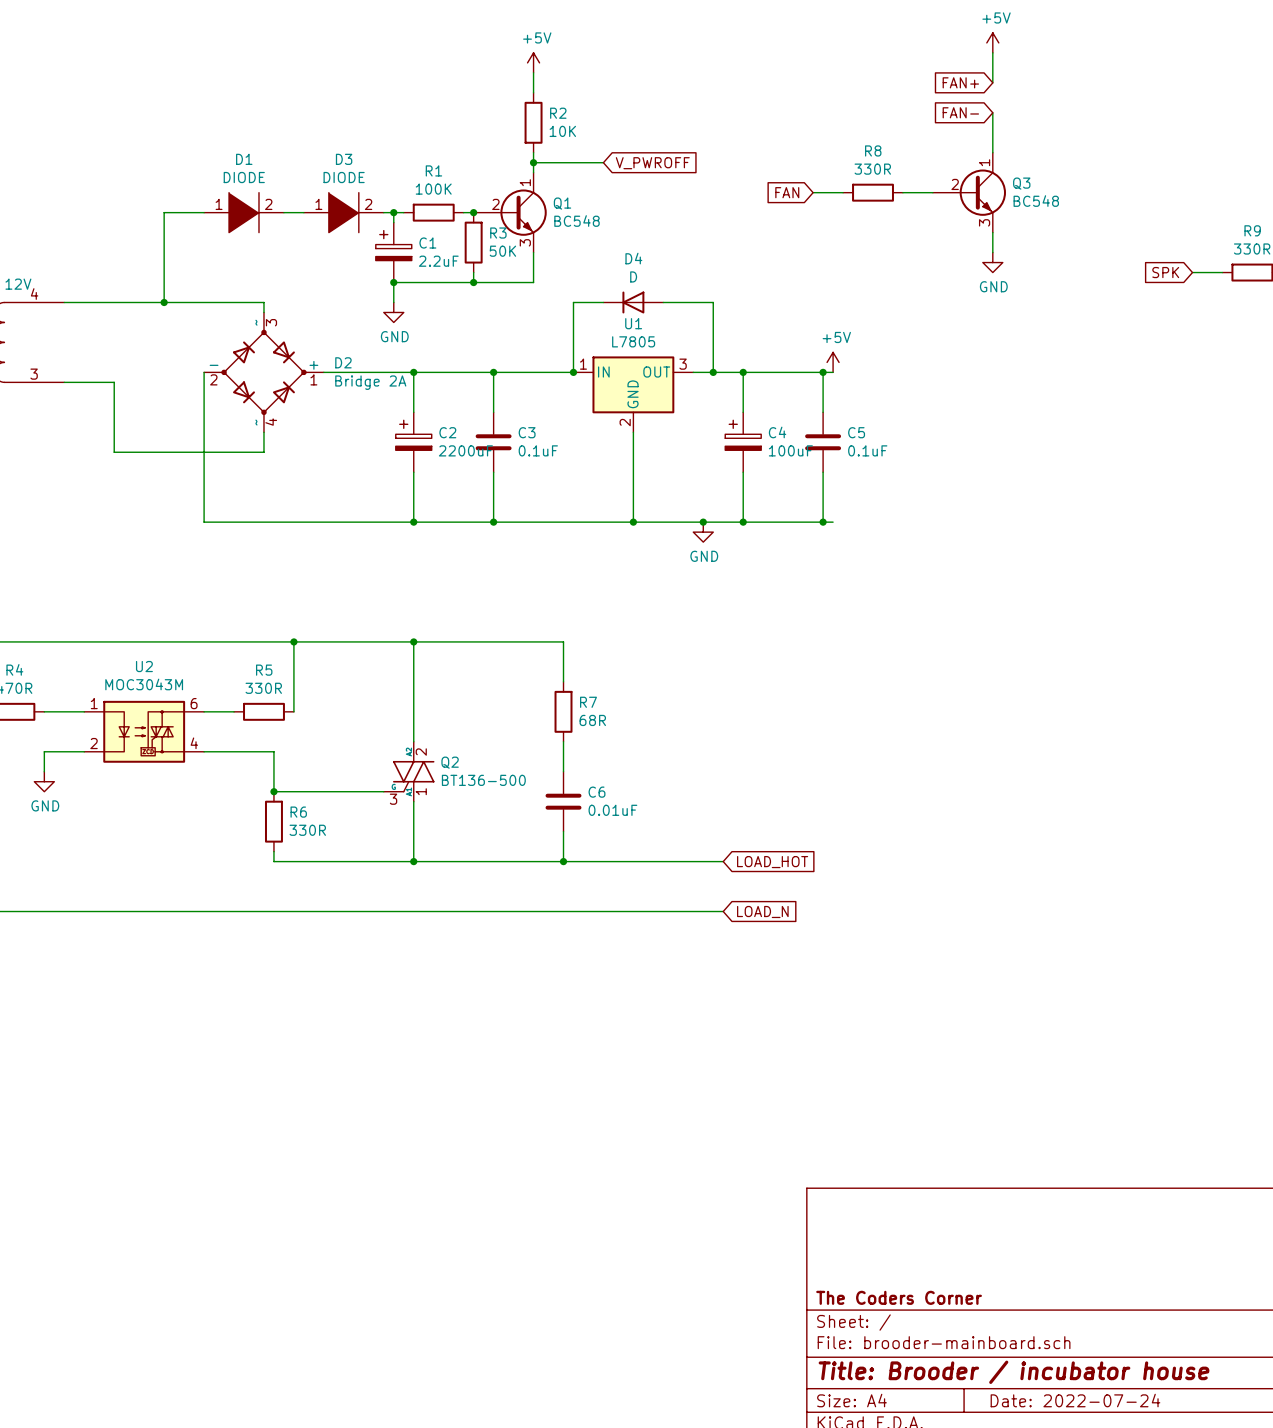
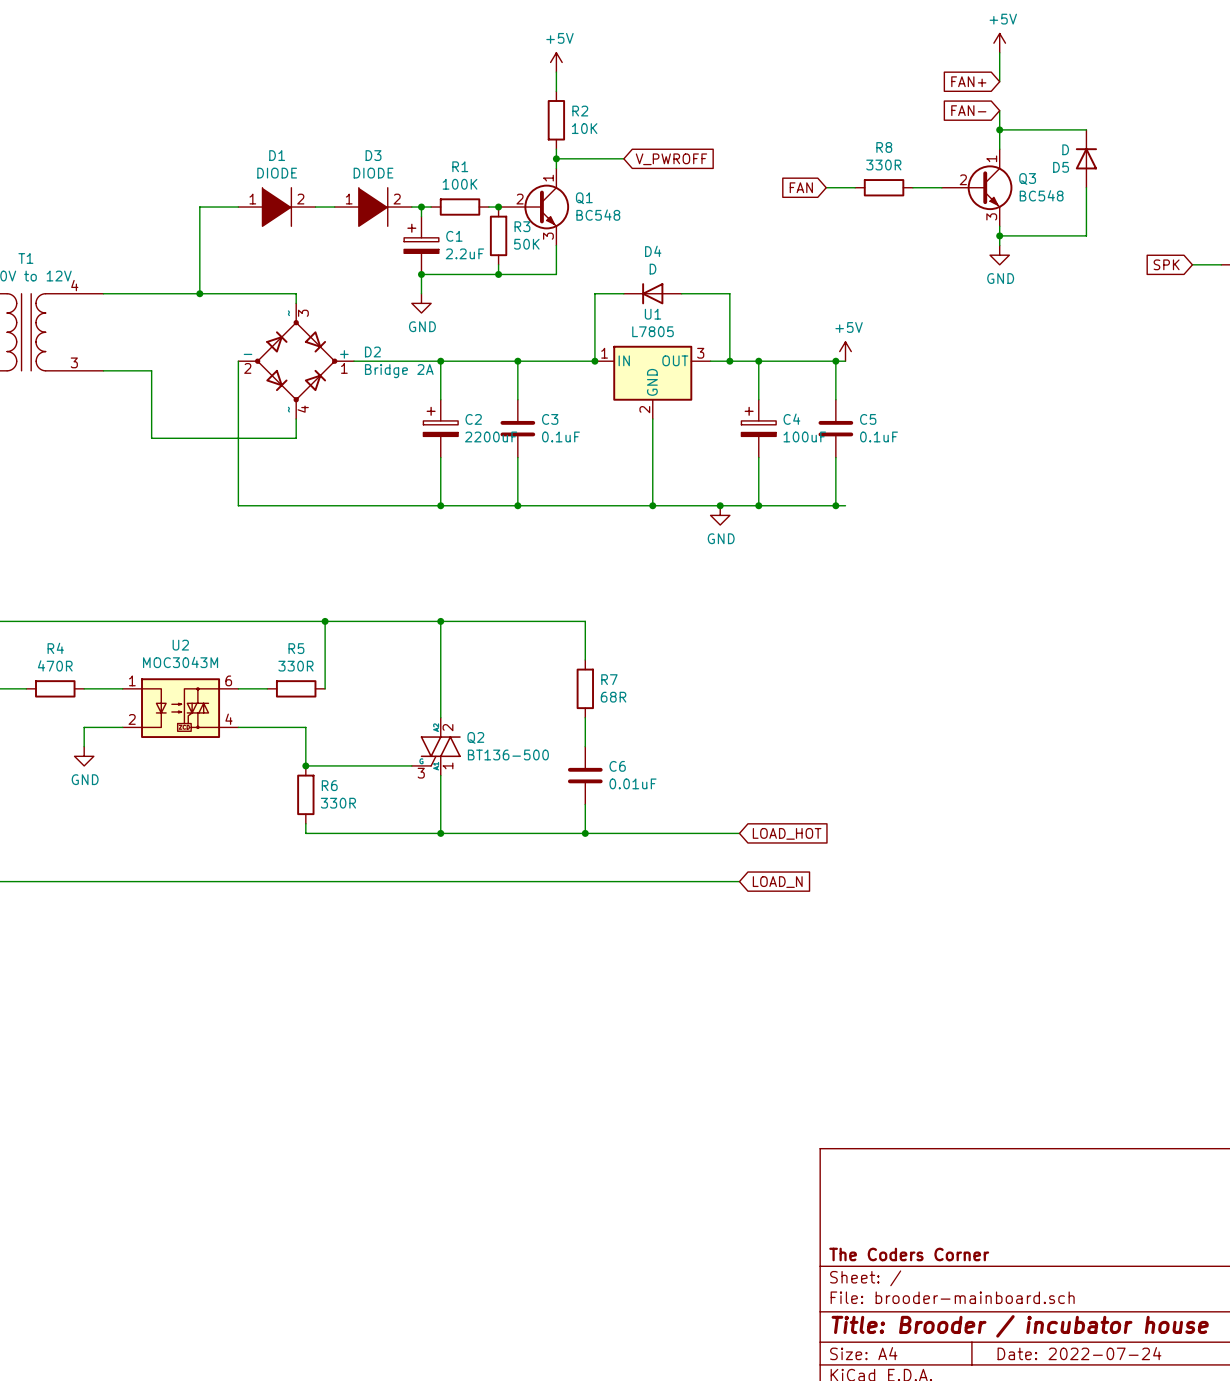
wire: none -> (999, 129) (1086, 129)
junction: none -> (999, 129)
D5: none -> D (1086, 158)
wire: none -> (1086, 187) (1086, 235) (999, 235)
junction: none -> (999, 235)

